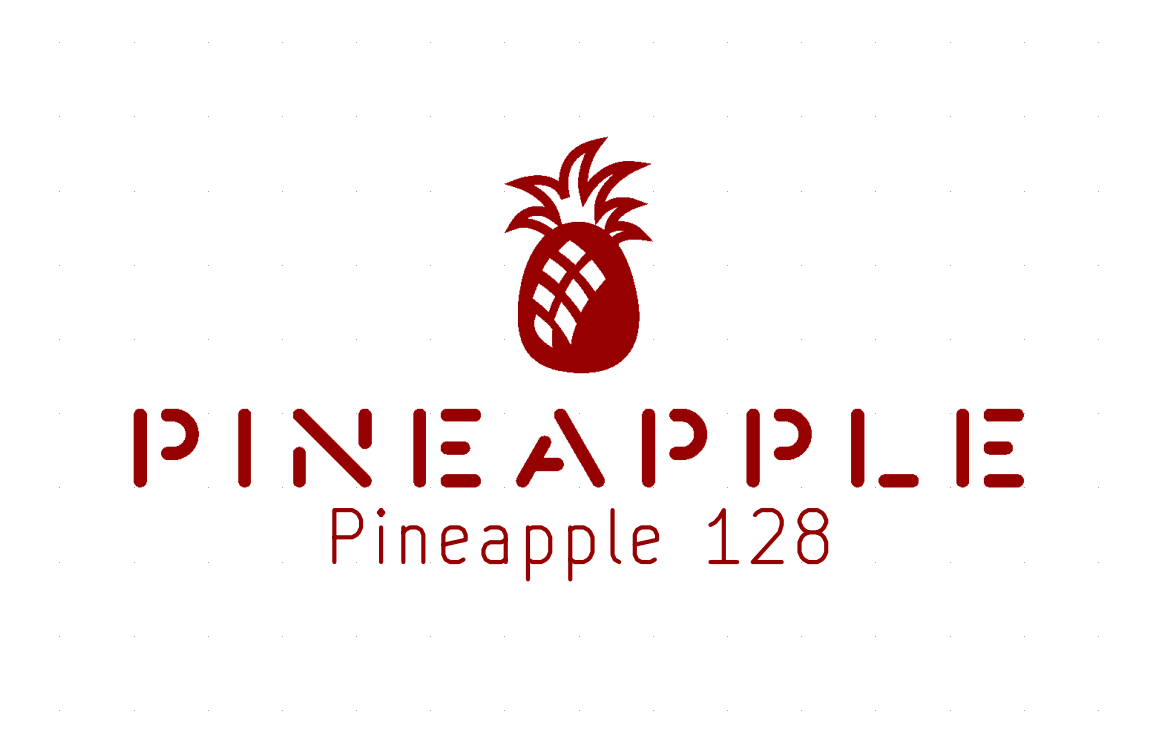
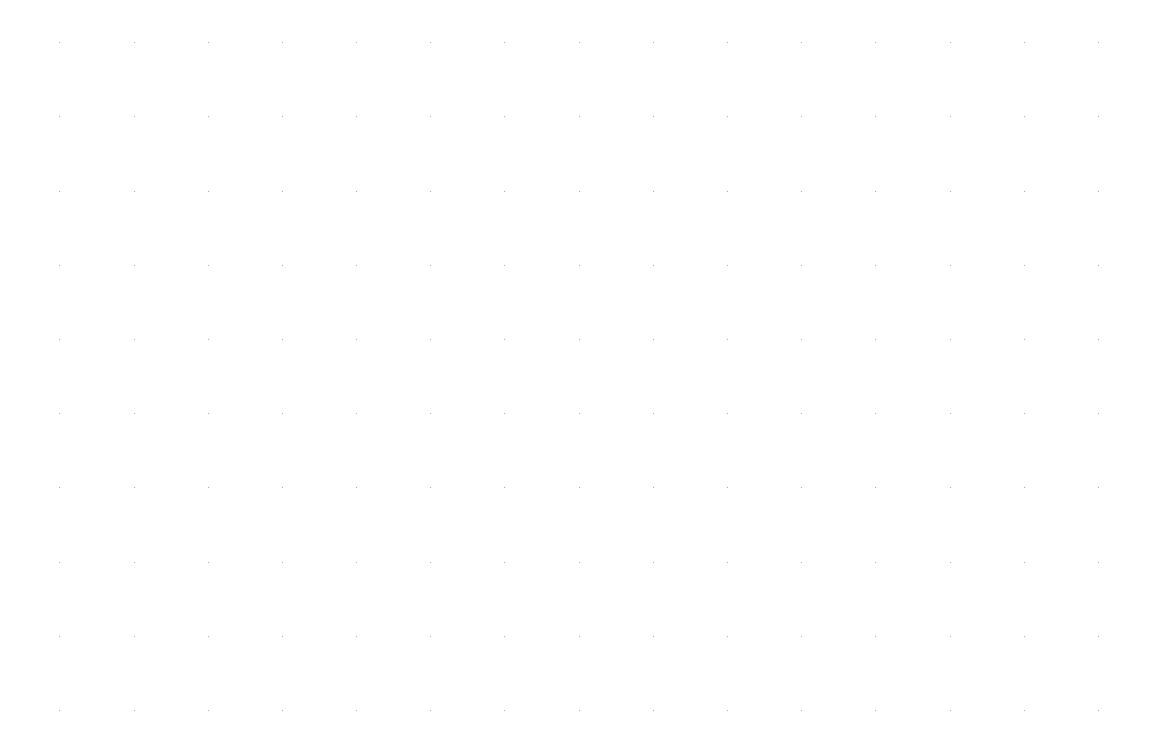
part: (578, 312) -> none
text: Pineapple 128 (580, 544) -> none

